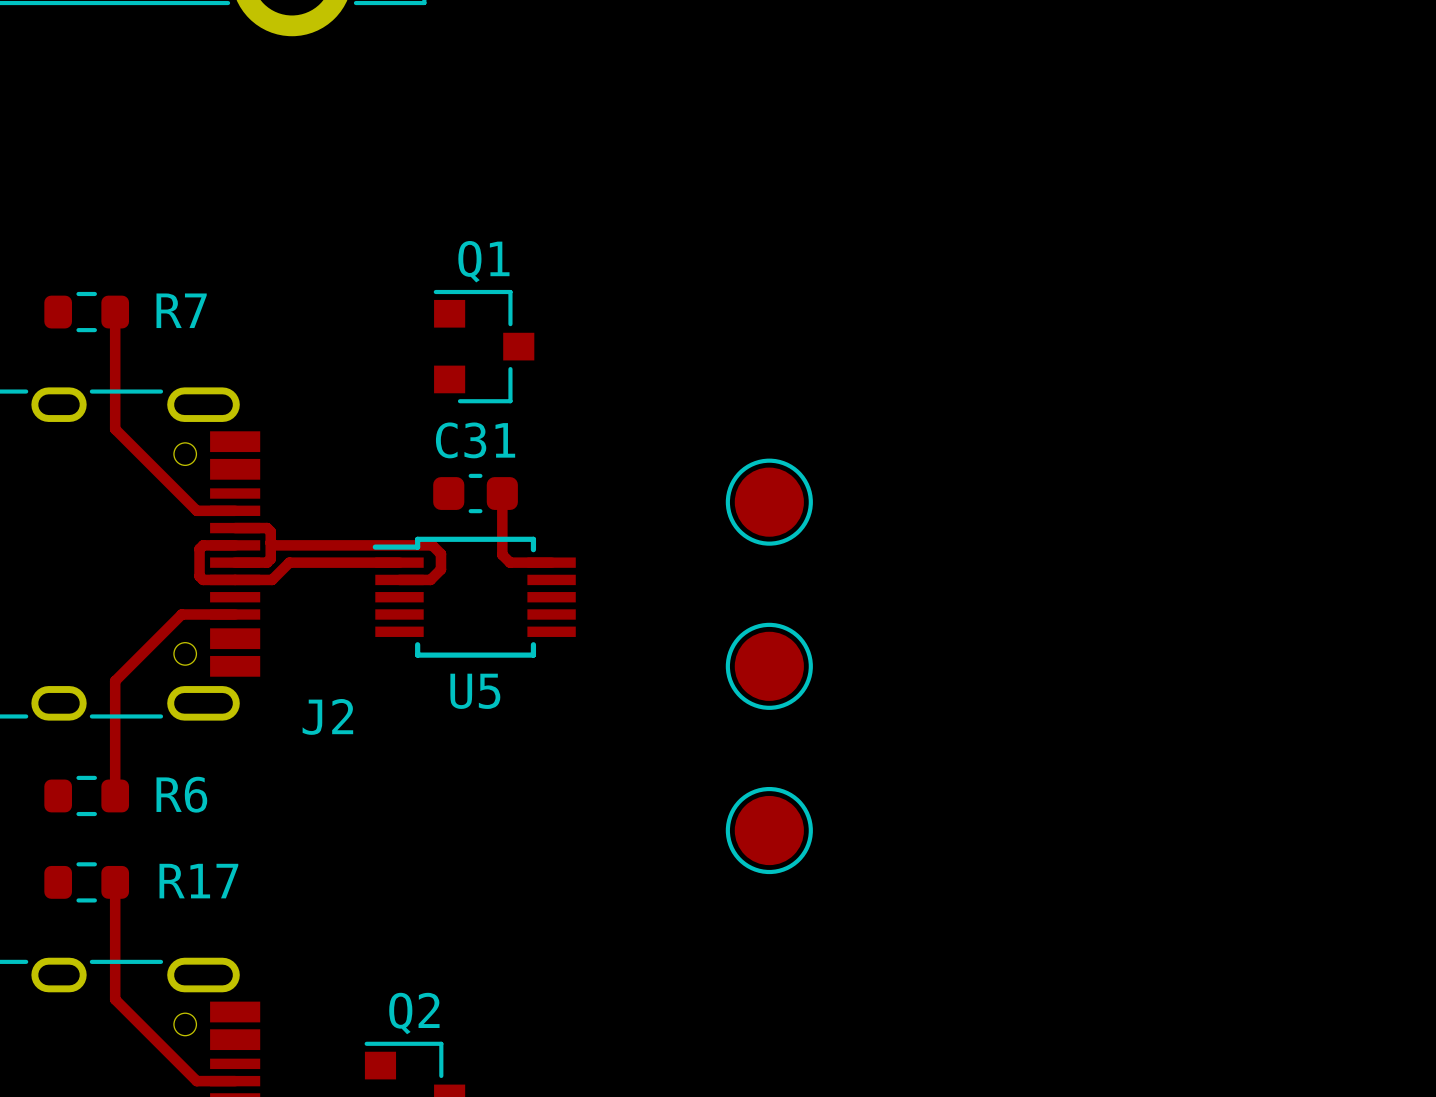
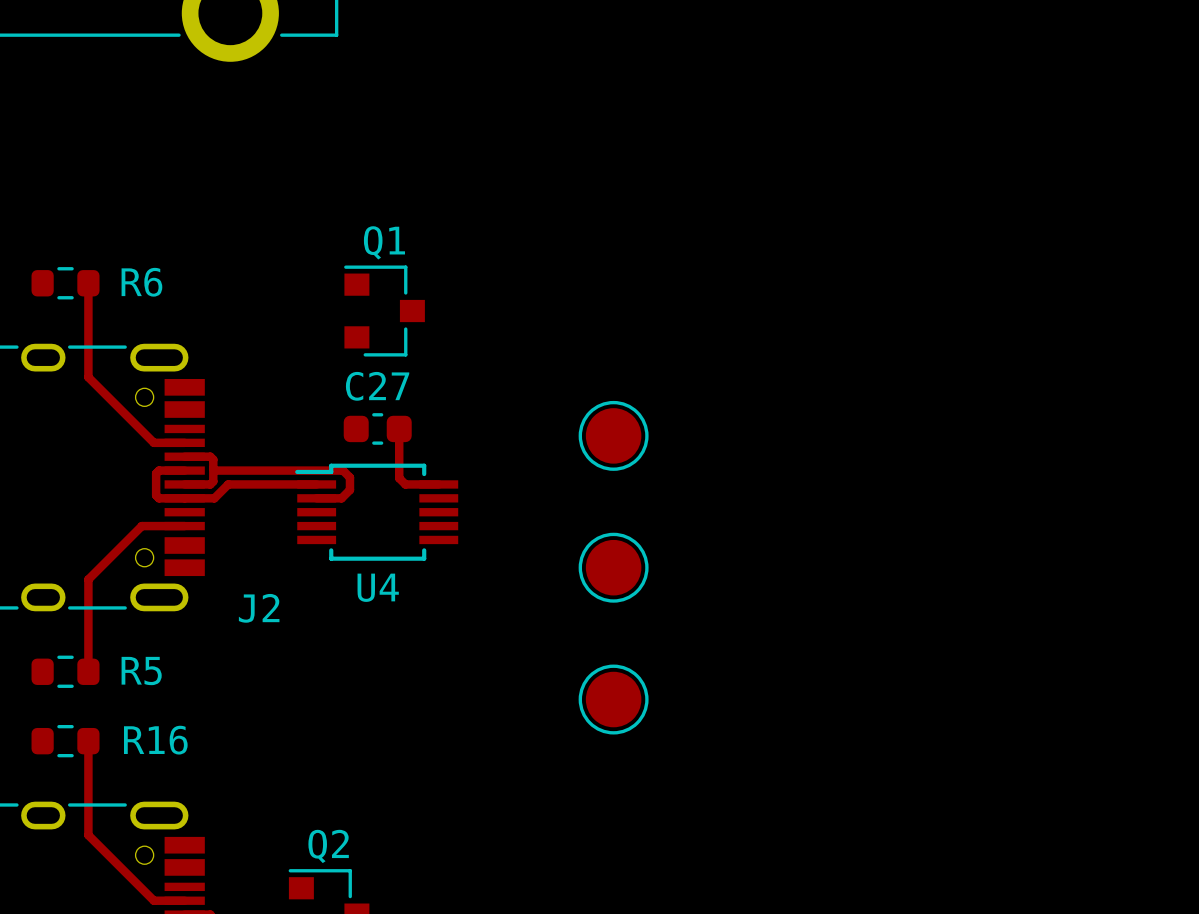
R7 name: R7 (181, 310) -> R6 (141, 282)
C31 name: C31 (475, 440) -> C27 (377, 386)
U5 name: U5 (475, 691) -> U4 (378, 587)
R6 name: R6 (181, 794) -> R5 (141, 671)
R17 name: R17 (198, 881) -> R16 (155, 740)

